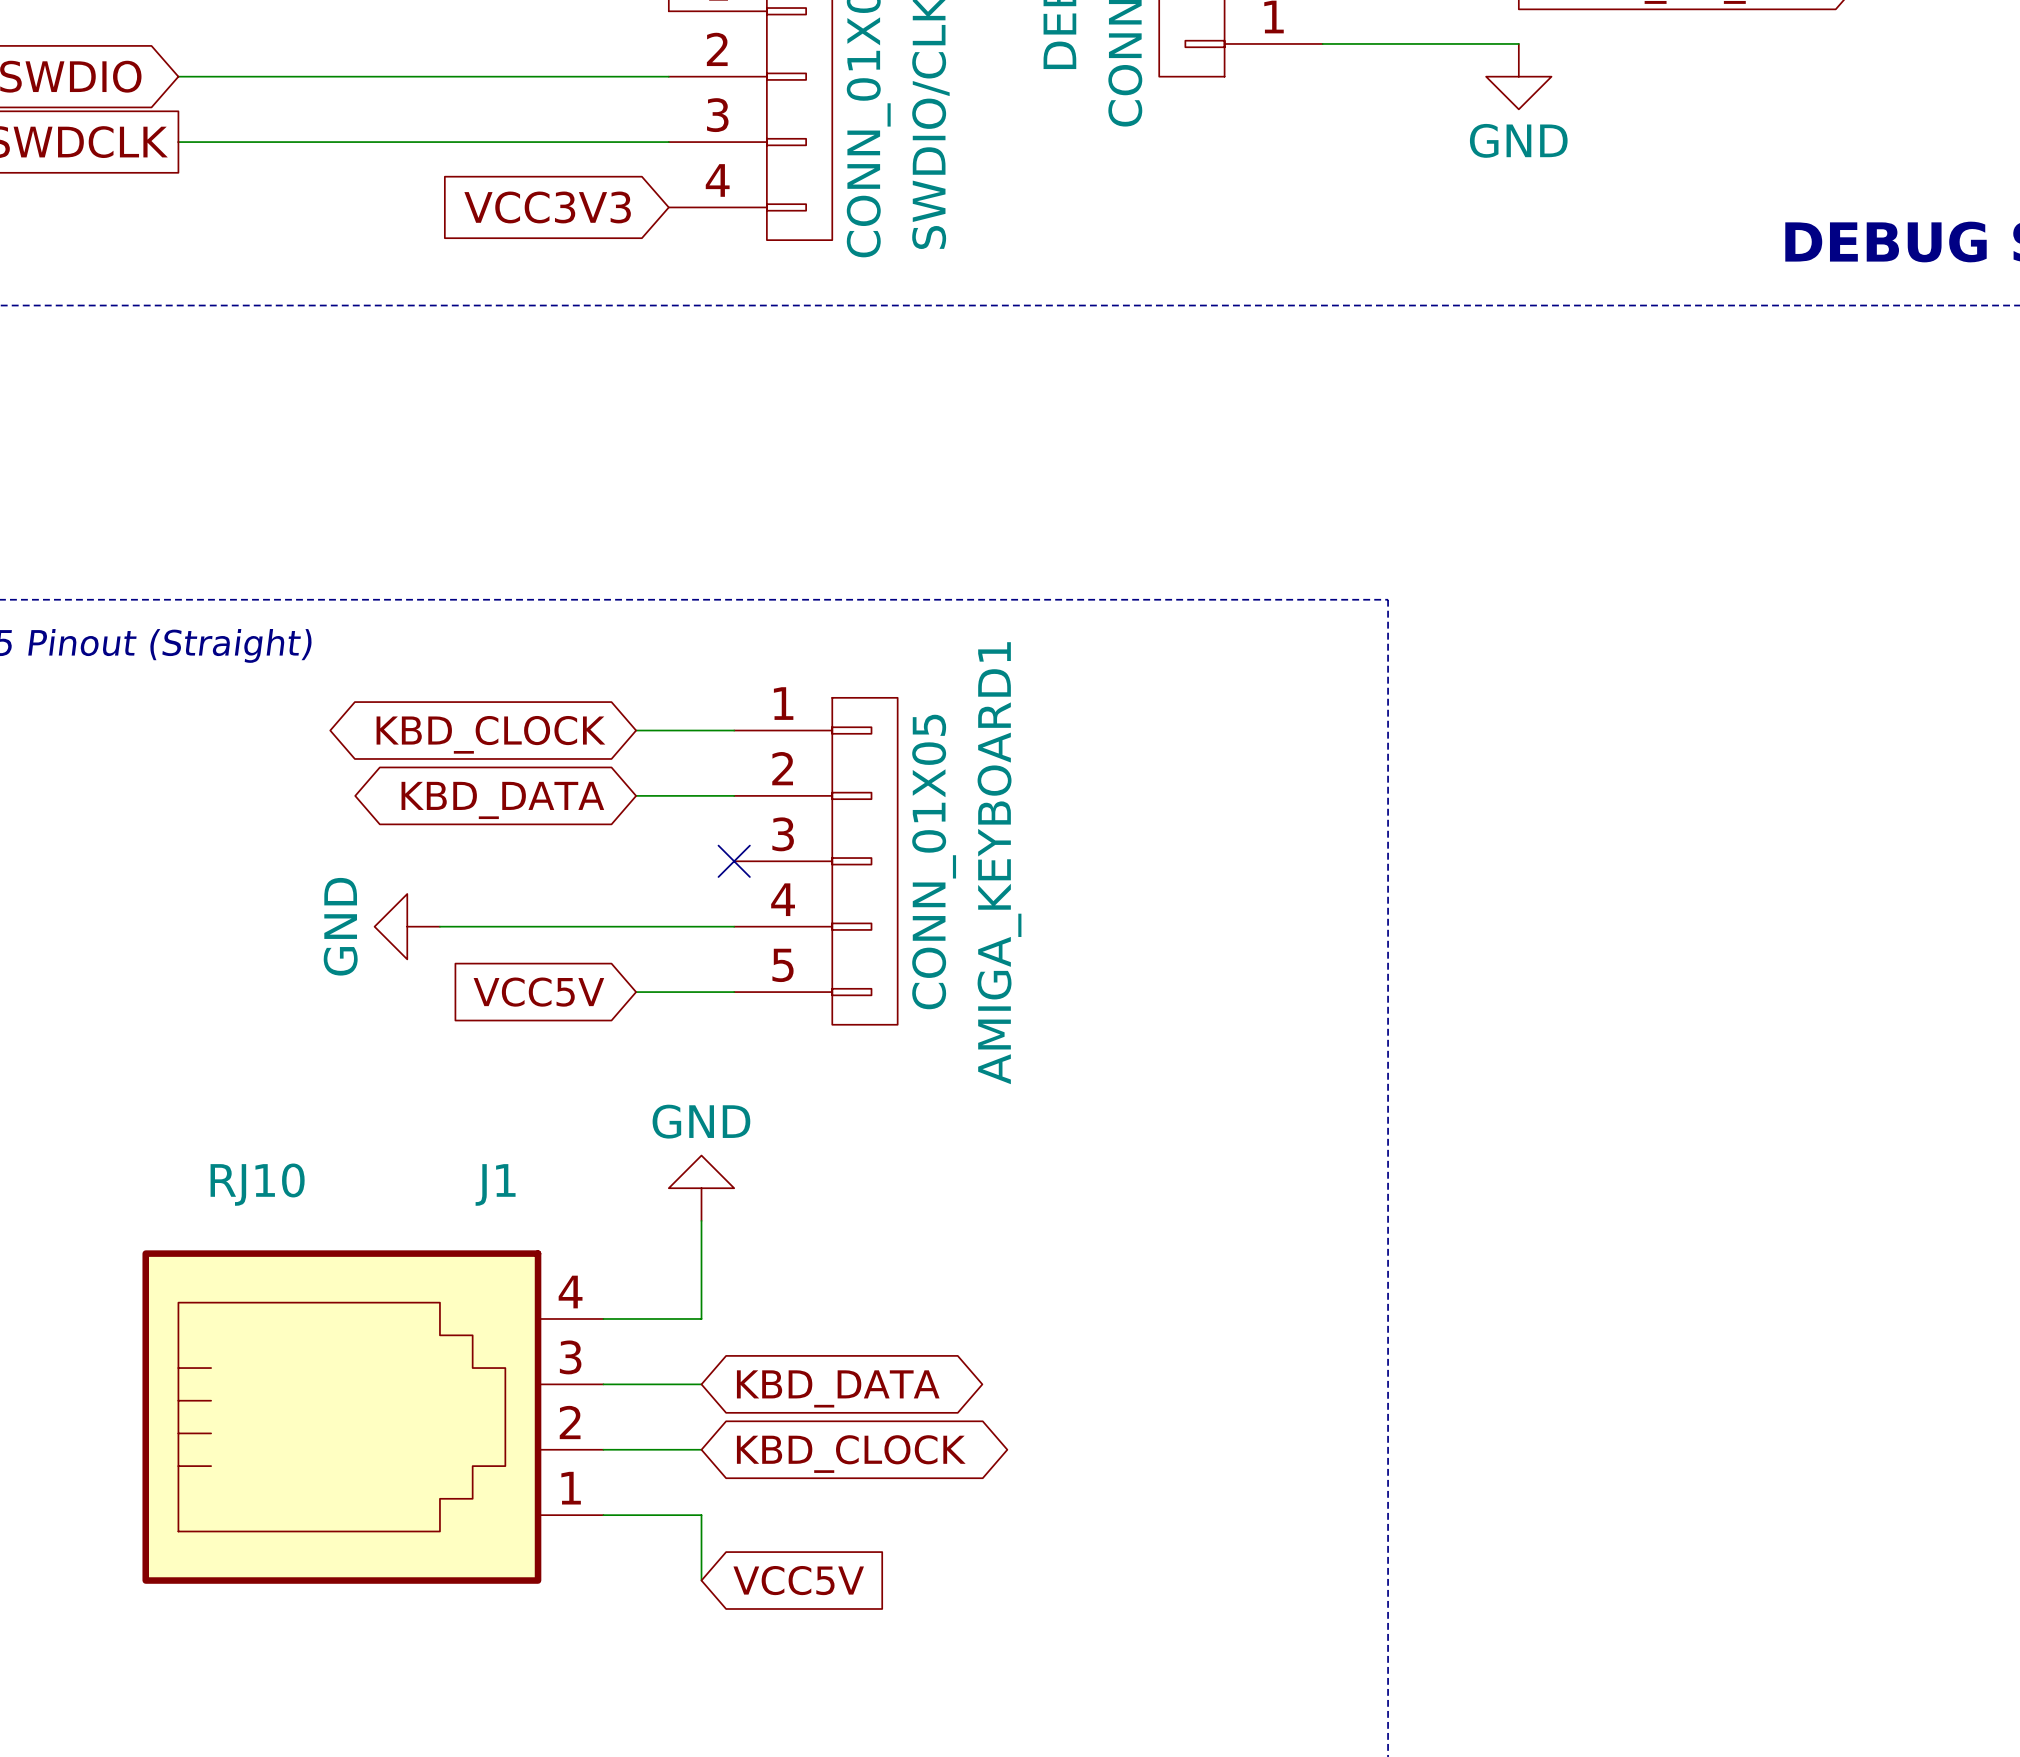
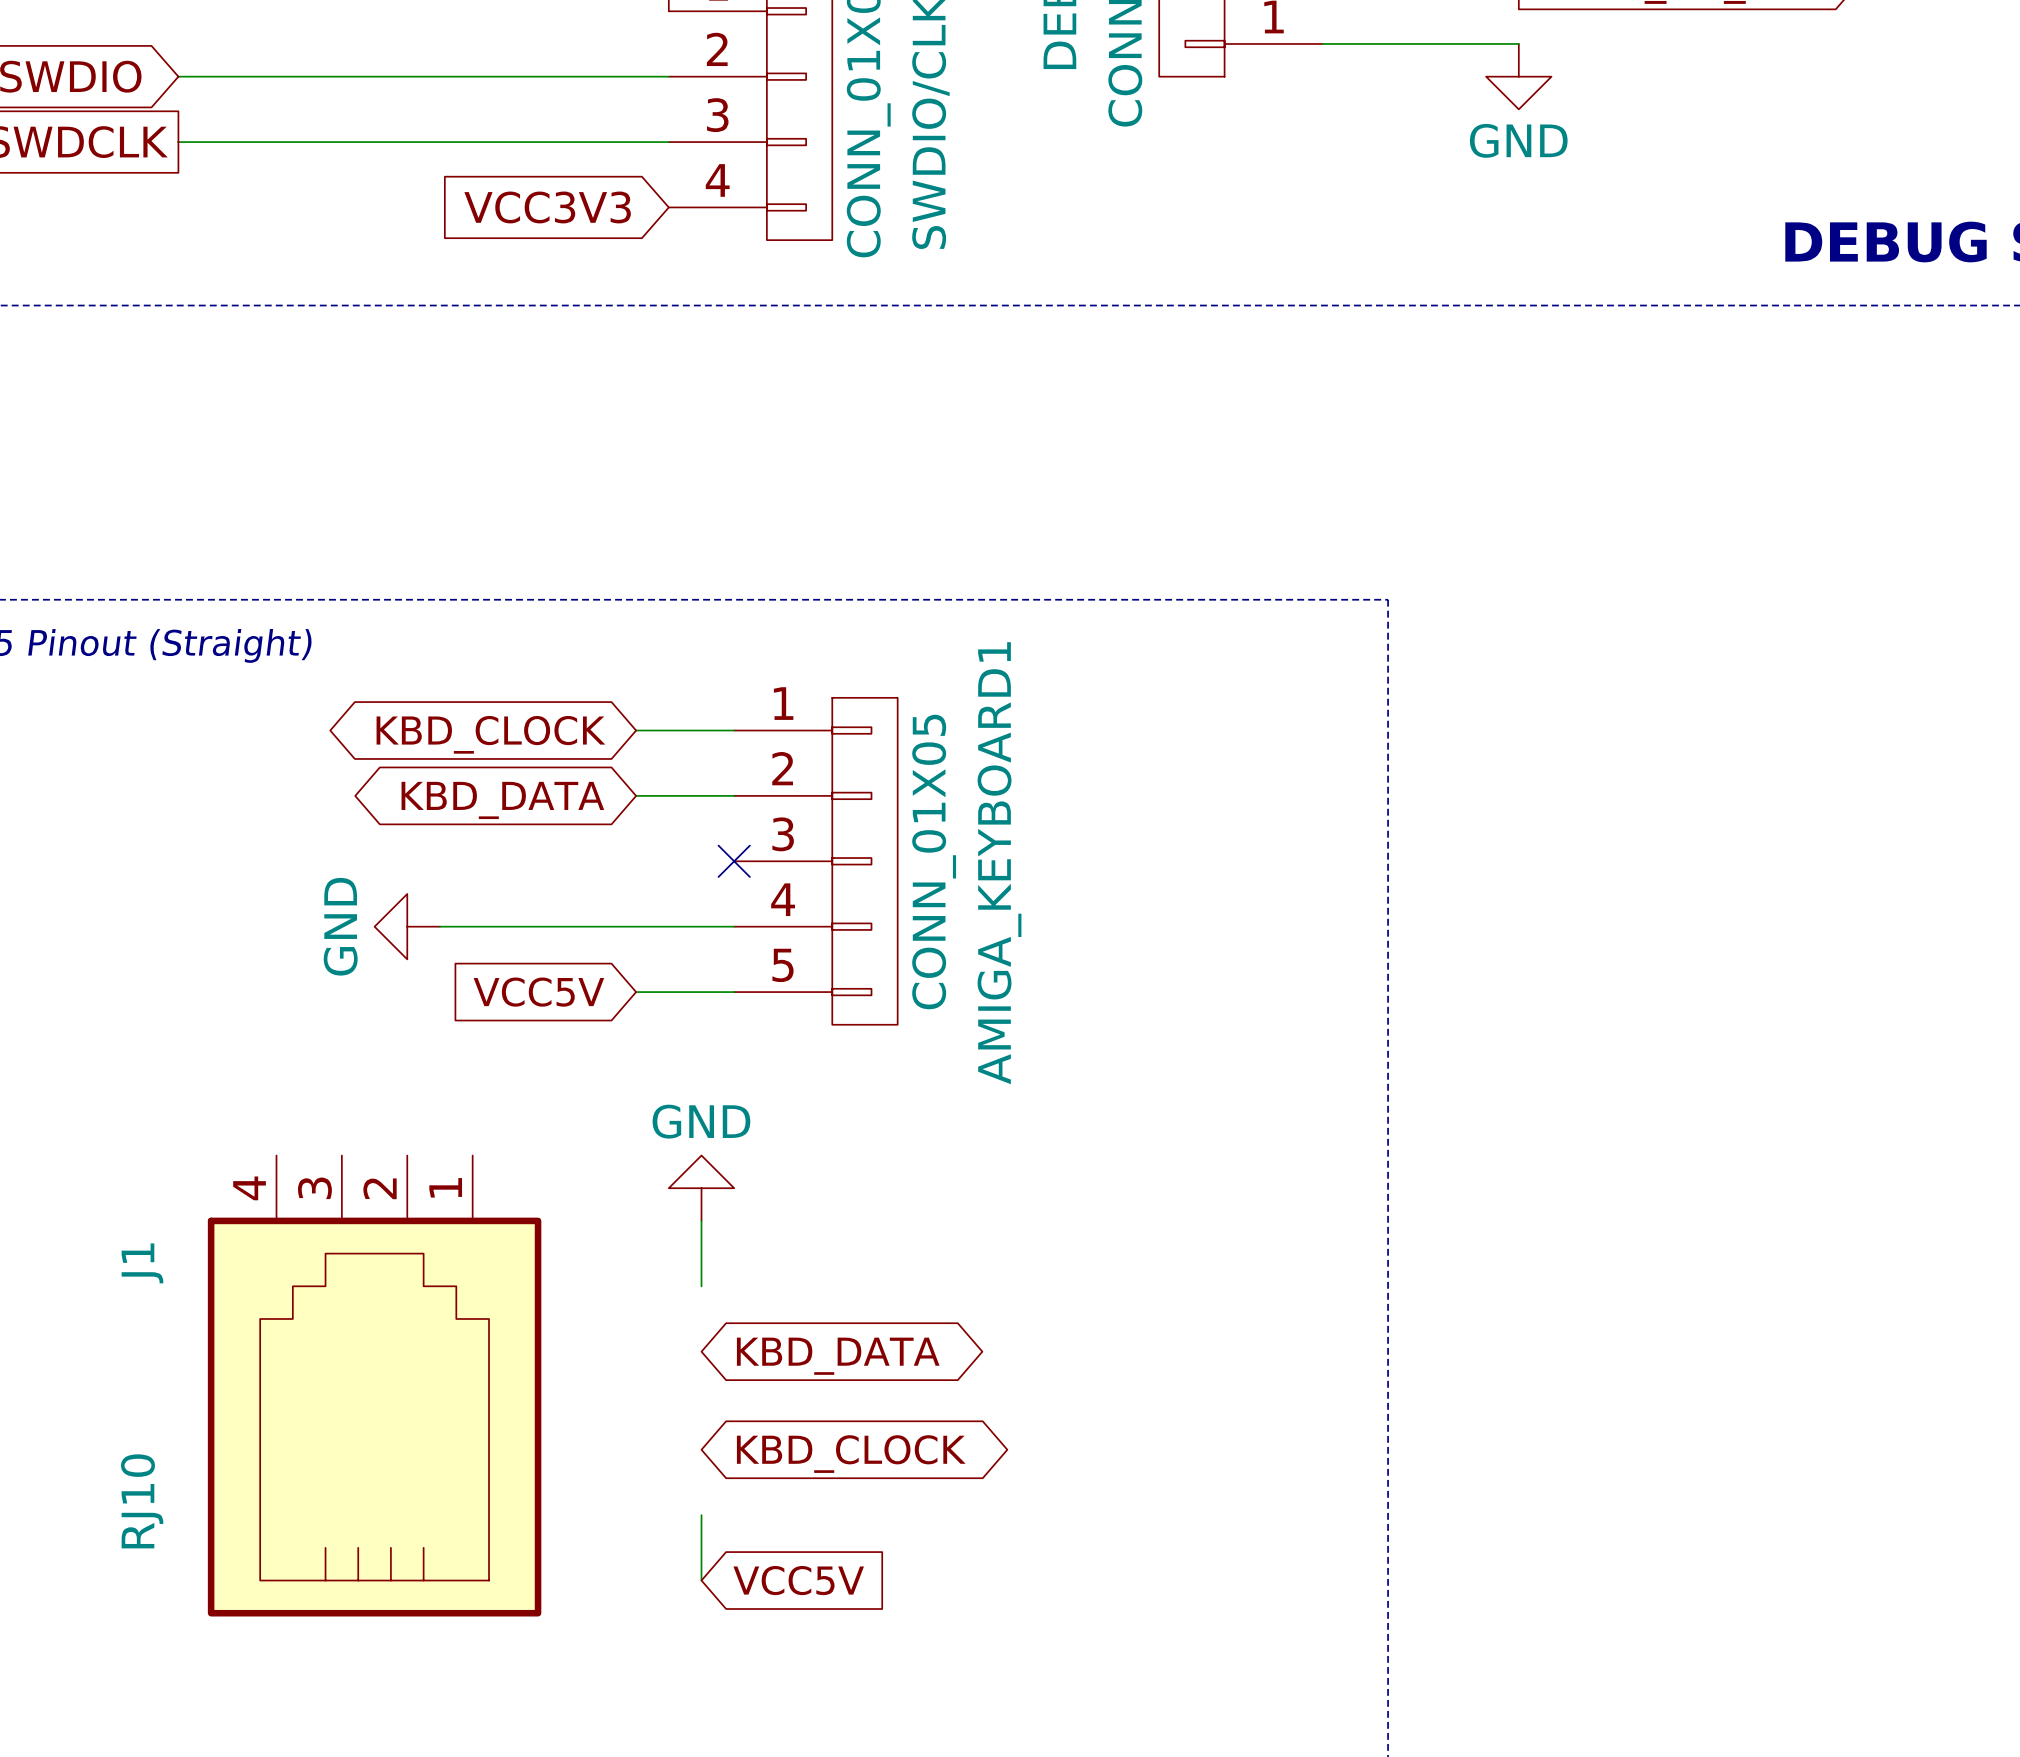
wire: (701, 1286) (701, 1318) (603, 1318) -> none
wire: (603, 1384) (701, 1384) -> none
global label position: KBD_DATA (838, 1388) -> KBD_DATA (838, 1356)
J1 rotation: 0° (341, 1417) -> 90° counterclockwise (374, 1417)
wire: (603, 1449) (701, 1449) -> none
wire: (603, 1515) (701, 1515) -> none

